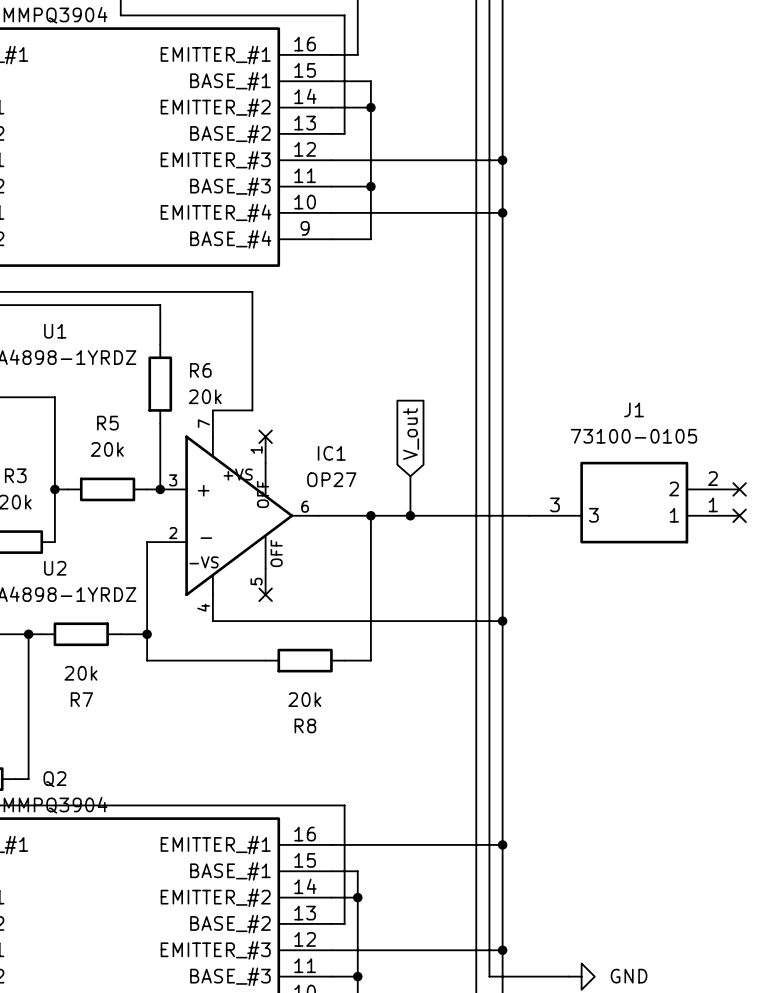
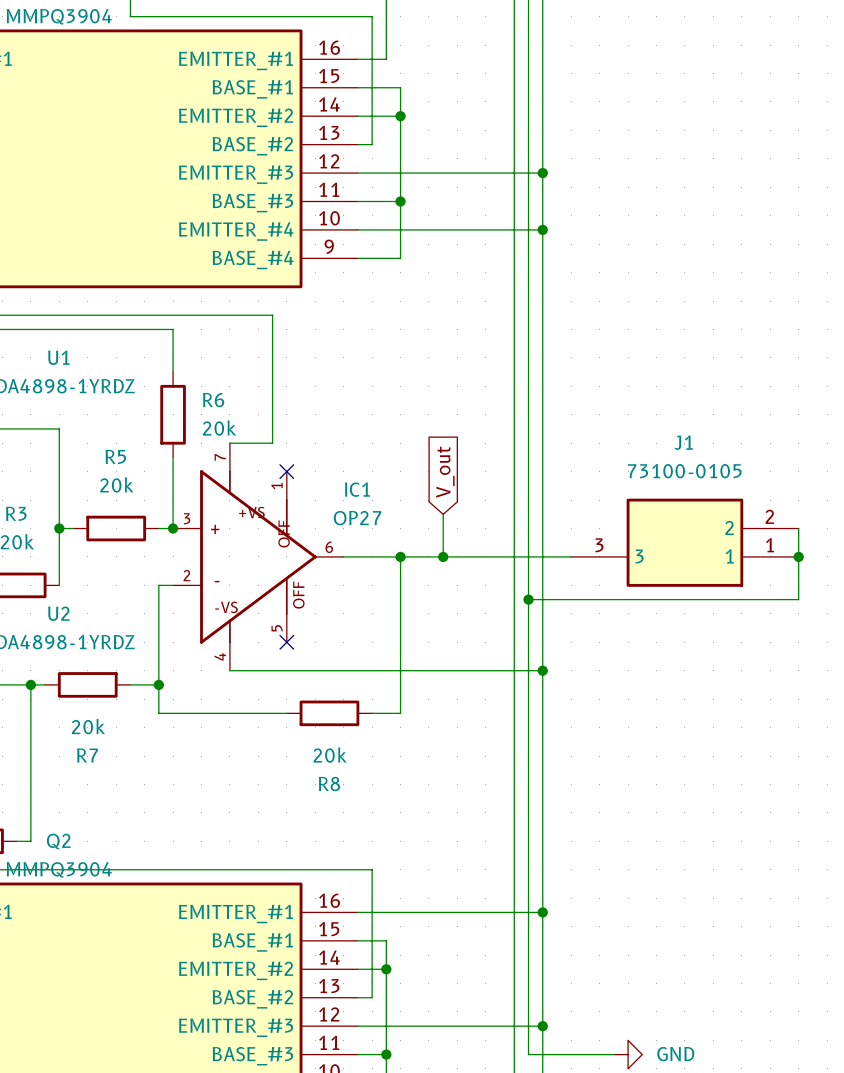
wire: none -> (798, 528) (798, 599) (528, 599)
no-connect mark: (739, 489) -> none
no-connect mark: (739, 515) -> none
junction: none -> (798, 556)
junction: none -> (528, 599)

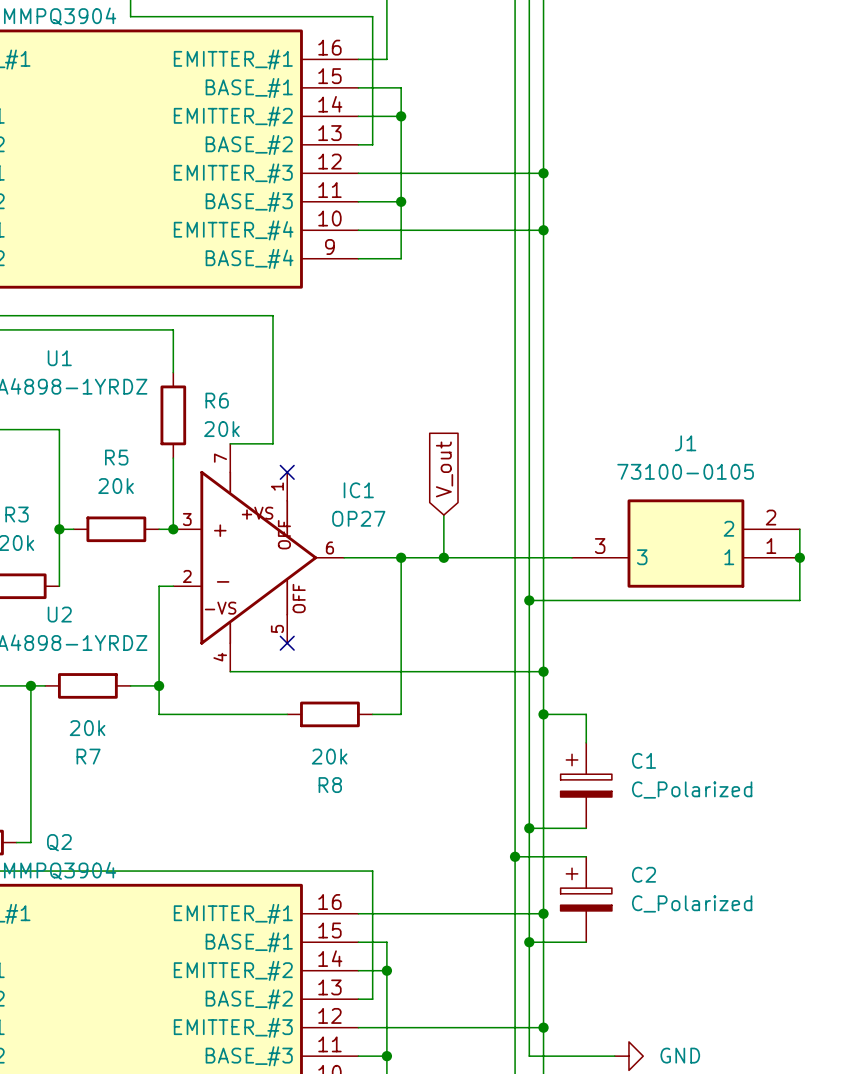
wire: none -> (543, 714) (586, 714) (586, 742)
junction: none -> (543, 714)
C1: none -> C_Polarized (586, 785)
wire: none -> (529, 828) (586, 828)
junction: none -> (529, 828)
wire: none -> (515, 856) (586, 856)
junction: none -> (515, 856)
C2: none -> C_Polarized (586, 899)
wire: none -> (529, 942) (586, 942)
junction: none -> (529, 942)

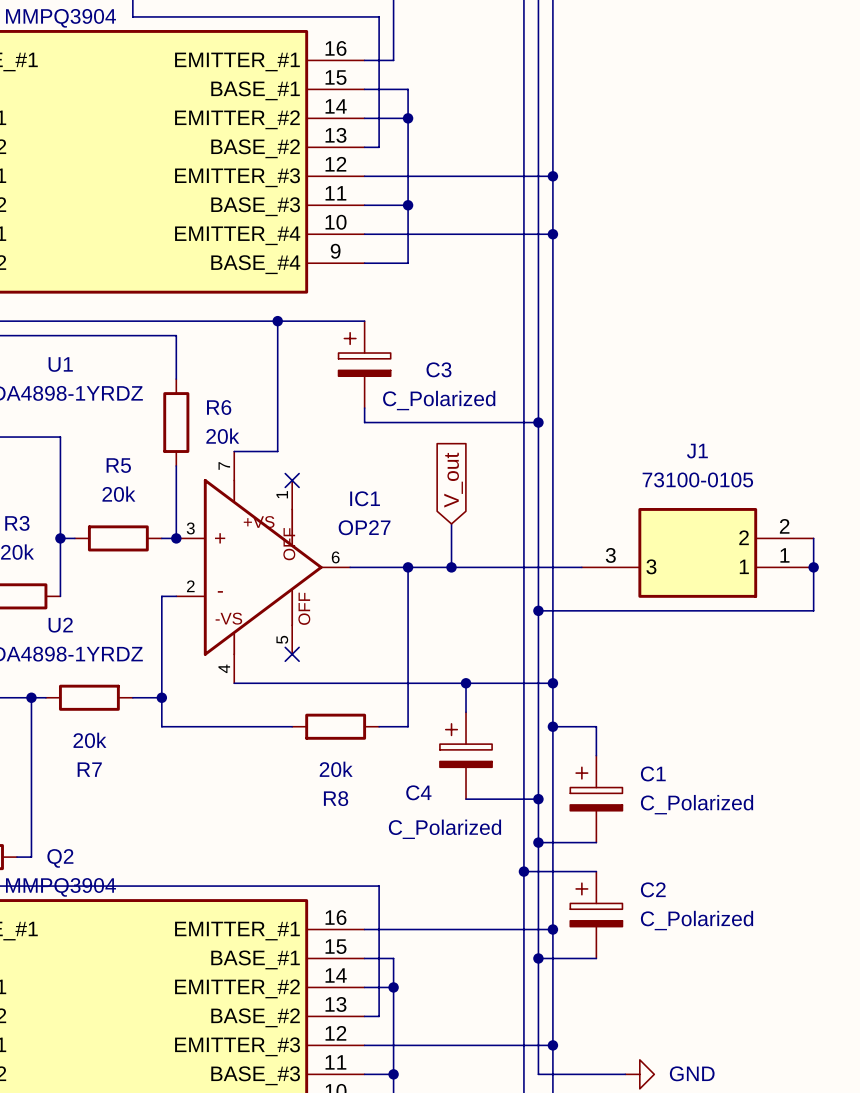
wire: none -> (277, 321) (364, 321)
junction: none -> (277, 321)
C3: none -> C_Polarized (364, 364)
wire: none -> (364, 408) (364, 422) (538, 422)
junction: none -> (538, 422)
wire: none -> (466, 683) (466, 712)
junction: none -> (466, 683)
C4: none -> C_Polarized (466, 755)
wire: none -> (466, 799) (538, 799)
junction: none -> (538, 799)

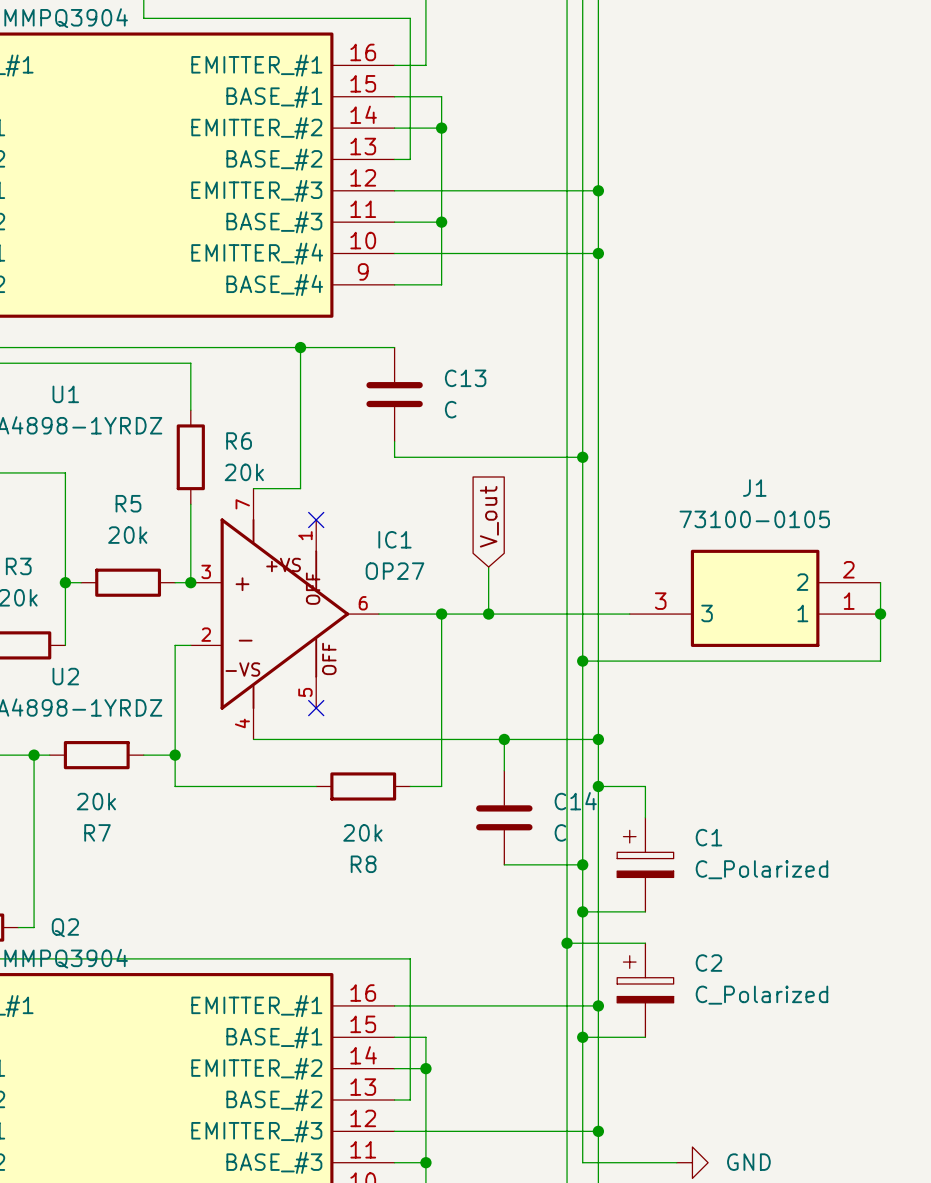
C3: C_Polarized (364, 364) -> none
C13: none -> C (394, 394)
C4: C_Polarized (466, 755) -> none
C14: none -> C (504, 817)

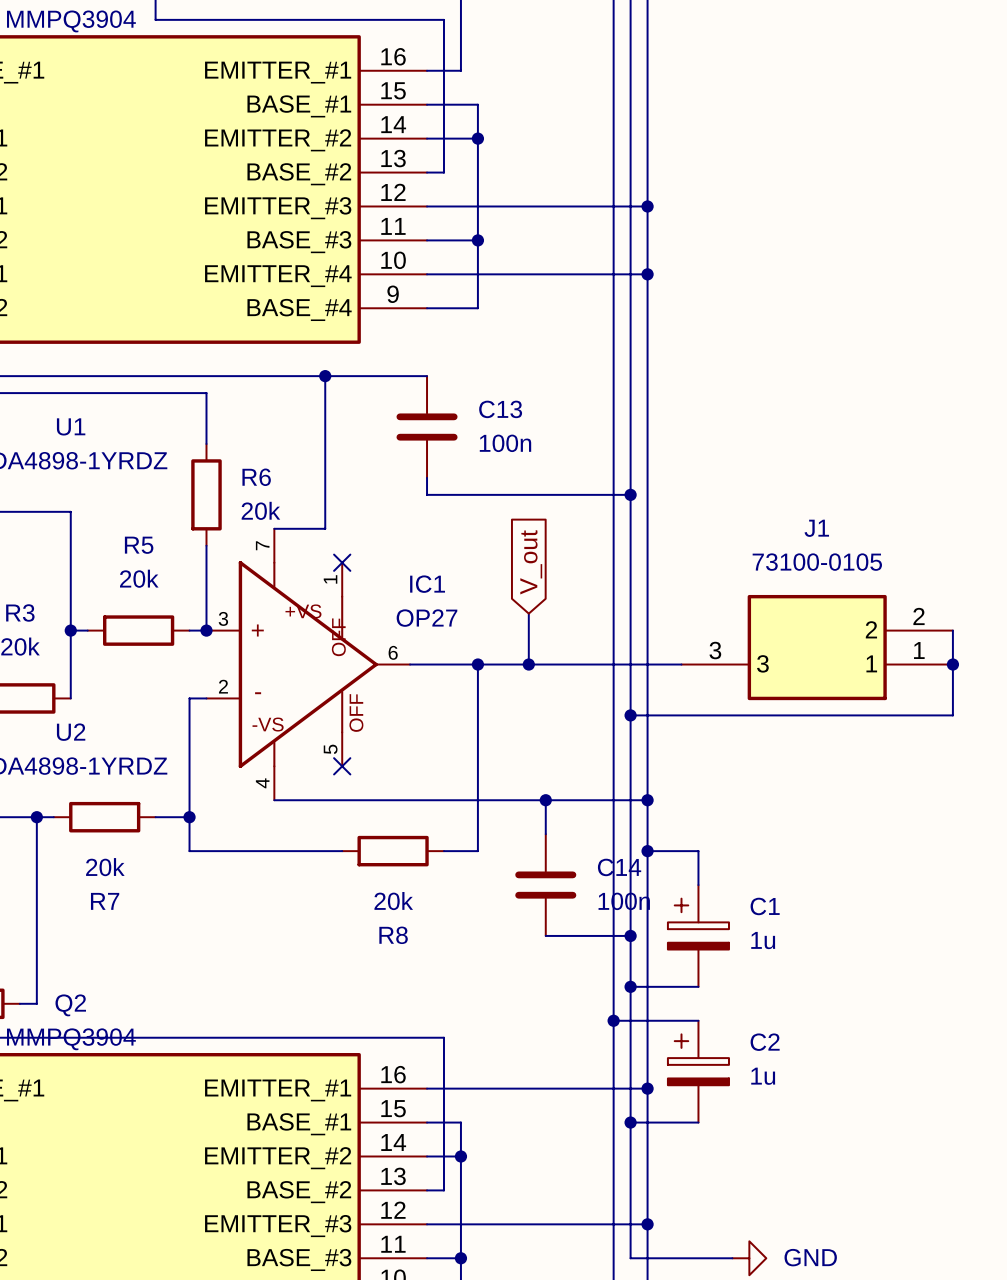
C13 value: C (450, 409) -> 100n (505, 443)
C14 value: C (560, 832) -> 100n (624, 901)
C1 value: C_Polarized (761, 869) -> 1u (763, 940)
C2 value: C_Polarized (761, 995) -> 1u (763, 1076)

